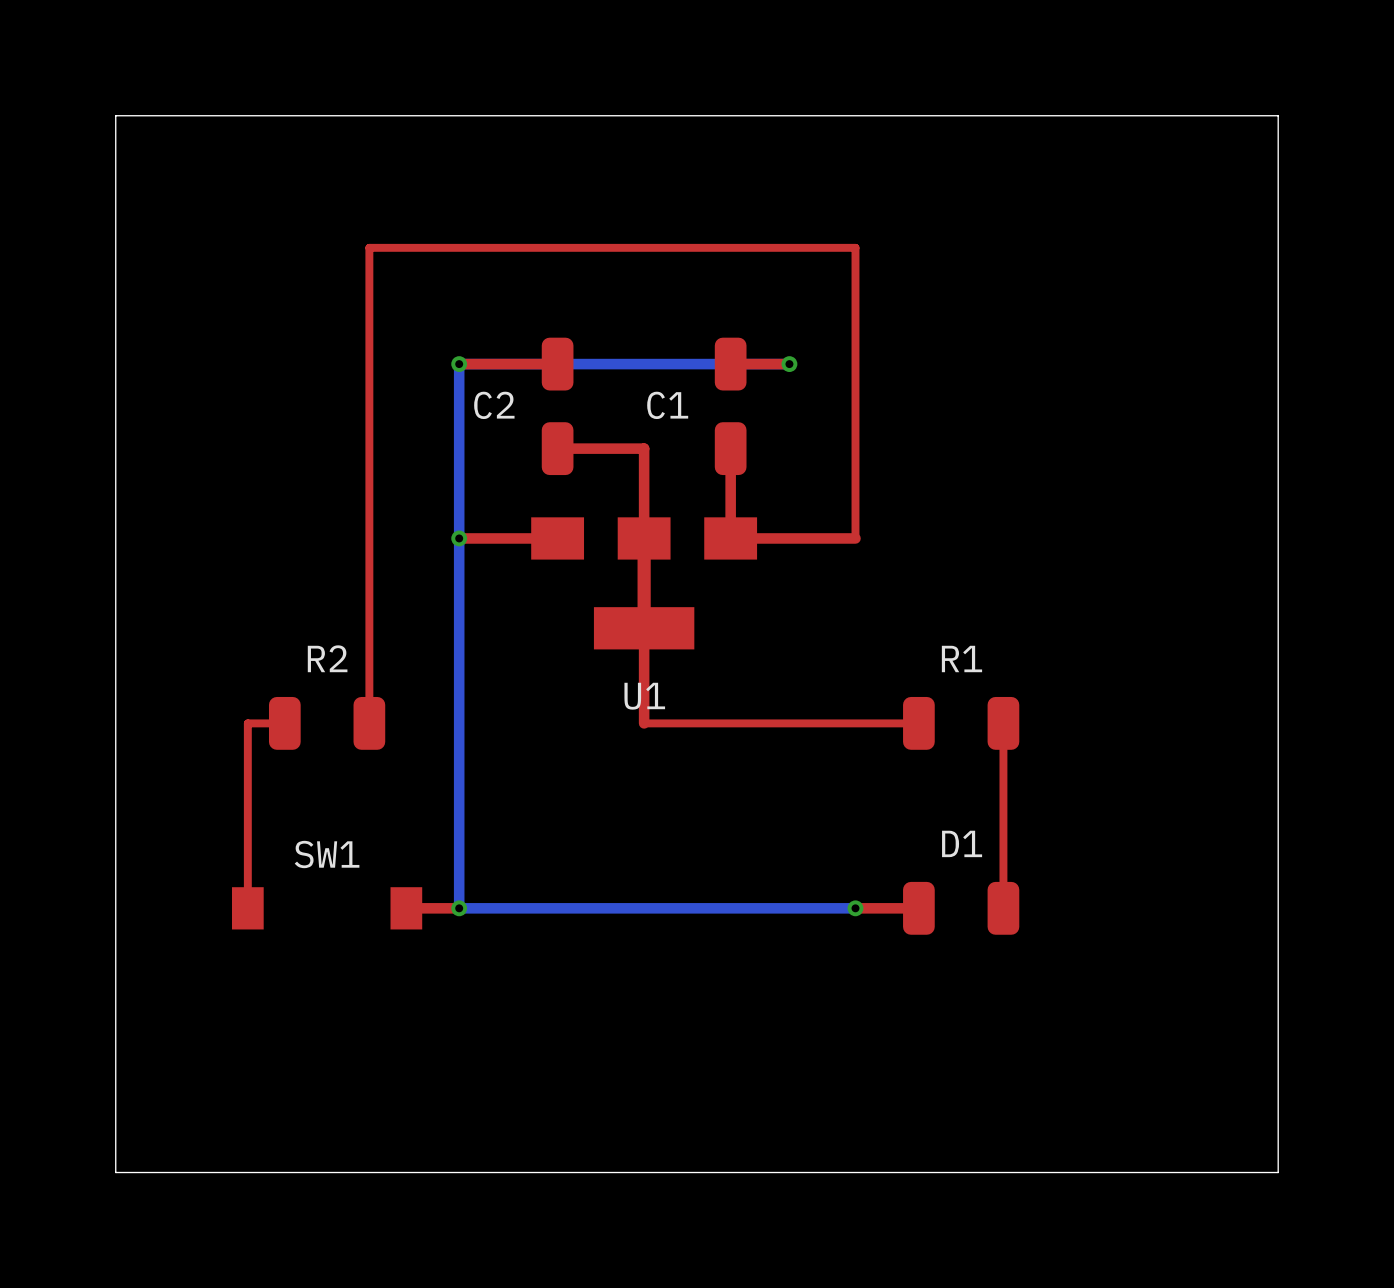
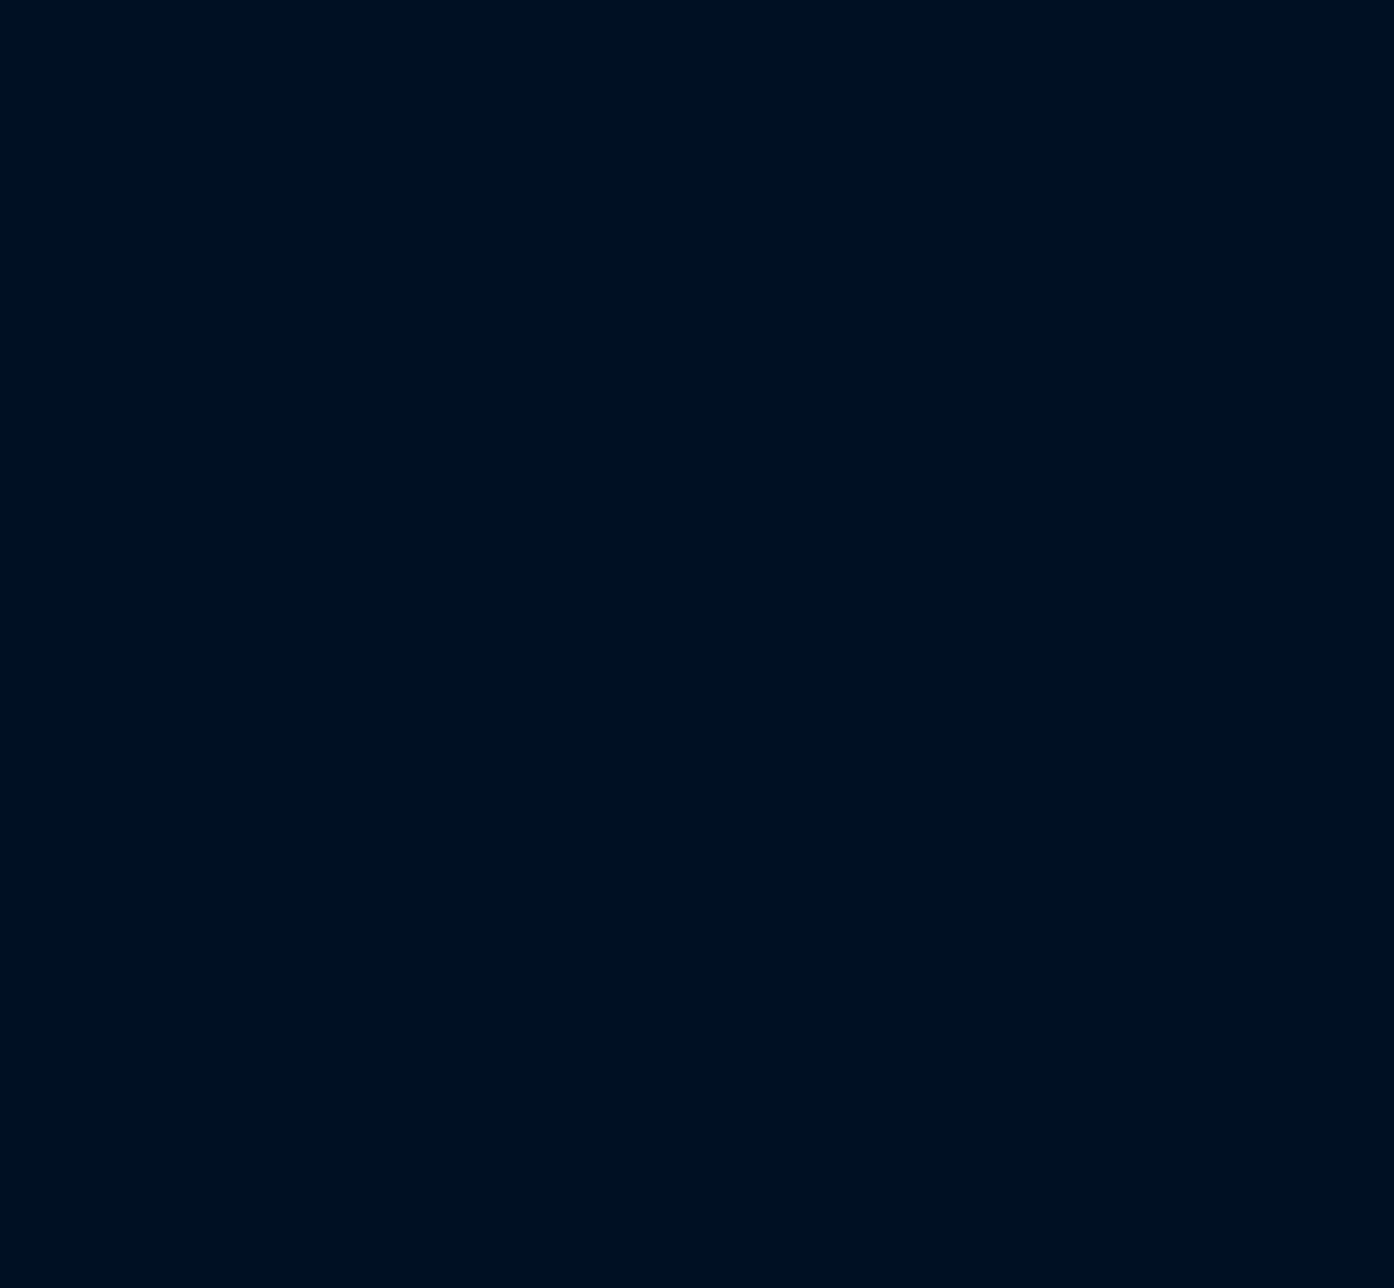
board edge: (115, 115) (1278, 115) (1278, 1172) (115, 1172) (115, 115) -> none
top track: (459, 364) (557, 364) -> none
via: (459, 364) -> none
top track: (730, 364) (789, 364) -> none
bottom track: (789, 364) (459, 364) (459, 908) (855, 908) -> none
via: (789, 364) -> none
C2: (557, 406) -> none
C1: (730, 406) -> none
top track: (557, 448) (644, 448) (644, 723) (918, 723) -> none
top track: (730, 448) (730, 538) (855, 538) (855, 247) (369, 247) (369, 723) -> none
top track: (459, 538) (557, 538) -> none
via: (459, 538) -> none
U1: (644, 583) -> none
top track: (284, 723) (247, 723) (247, 908) -> none
R2: (327, 723) -> none
R1: (961, 723) -> none
top track: (1003, 723) (1003, 908) -> none
SW1: (327, 908) -> none
top track: (406, 908) (459, 908) -> none
via: (459, 908) -> none
top track: (855, 908) (918, 908) -> none
via: (855, 908) -> none
D1: (961, 908) -> none

